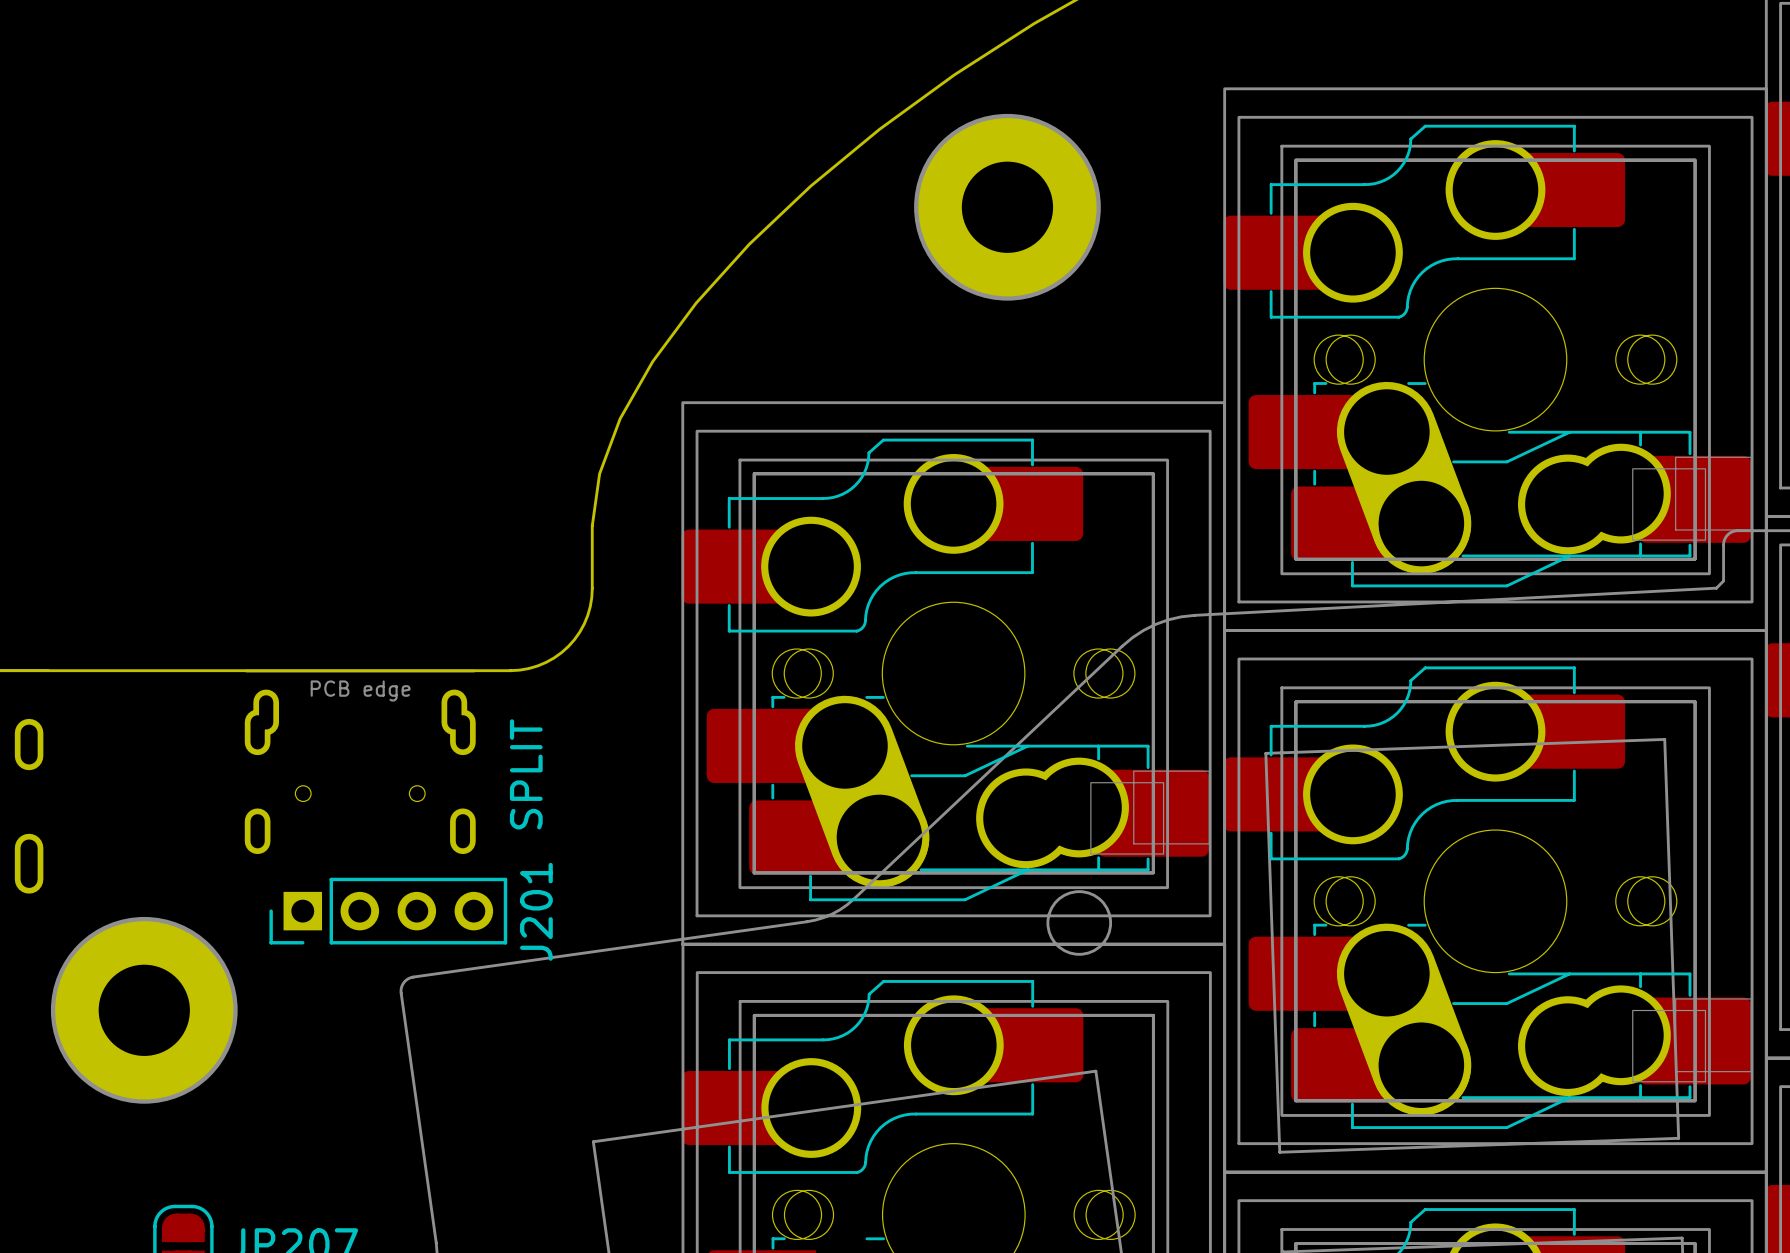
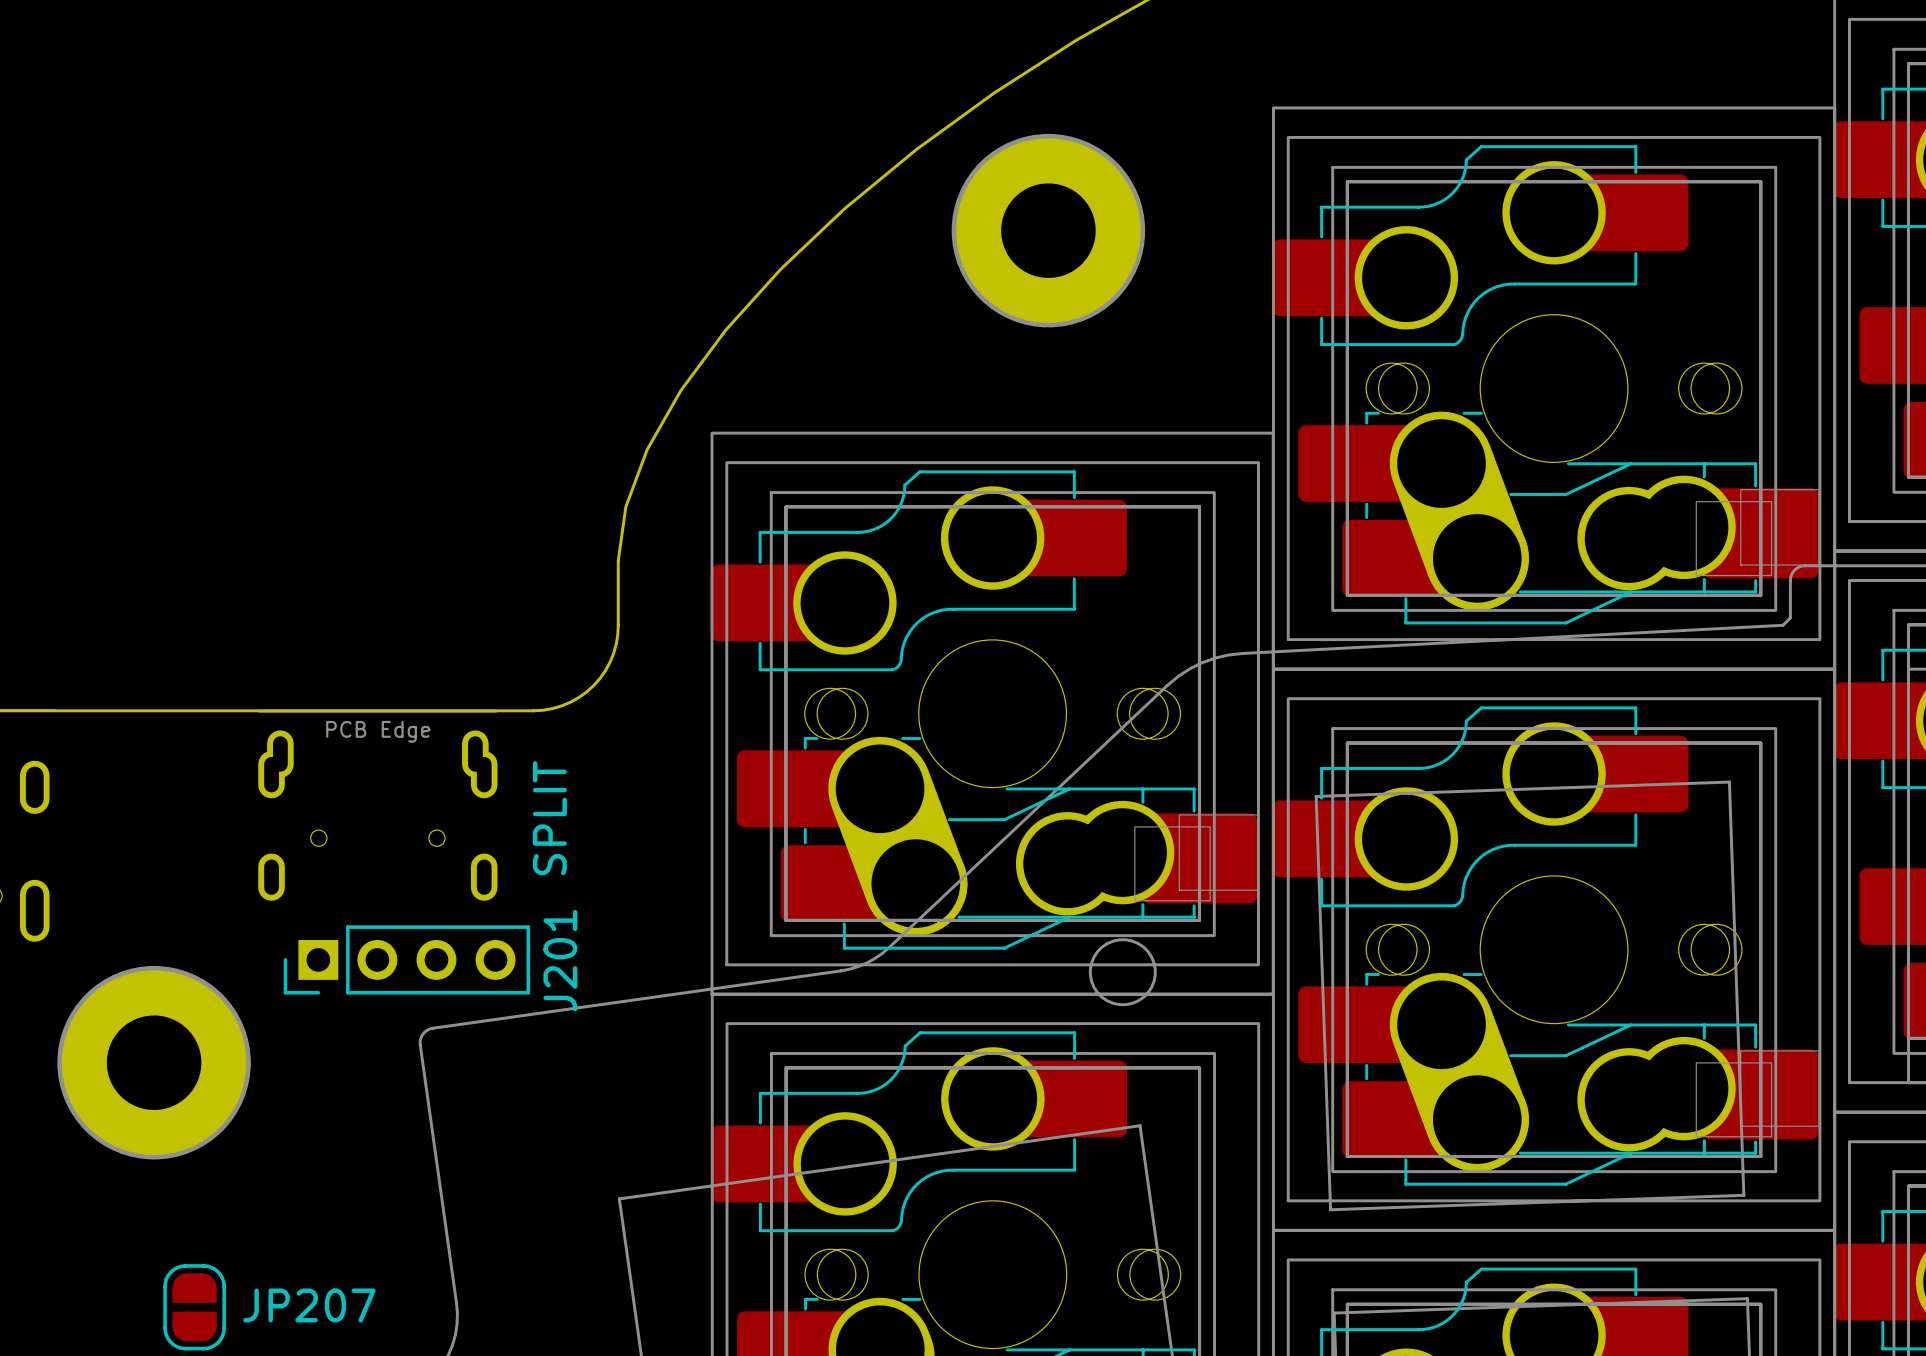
part text: PCB edge (360, 690) -> PCB Edge (378, 731)

